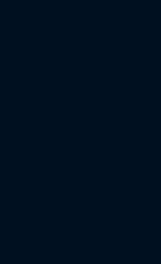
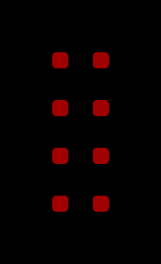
part: none -> (80, 60)
part: none -> (80, 108)
part: none -> (80, 155)
part: none -> (80, 203)

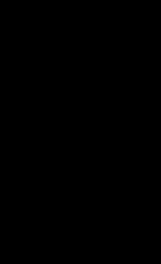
part: (80, 60) -> none
part: (80, 108) -> none
part: (80, 155) -> none
part: (80, 203) -> none

